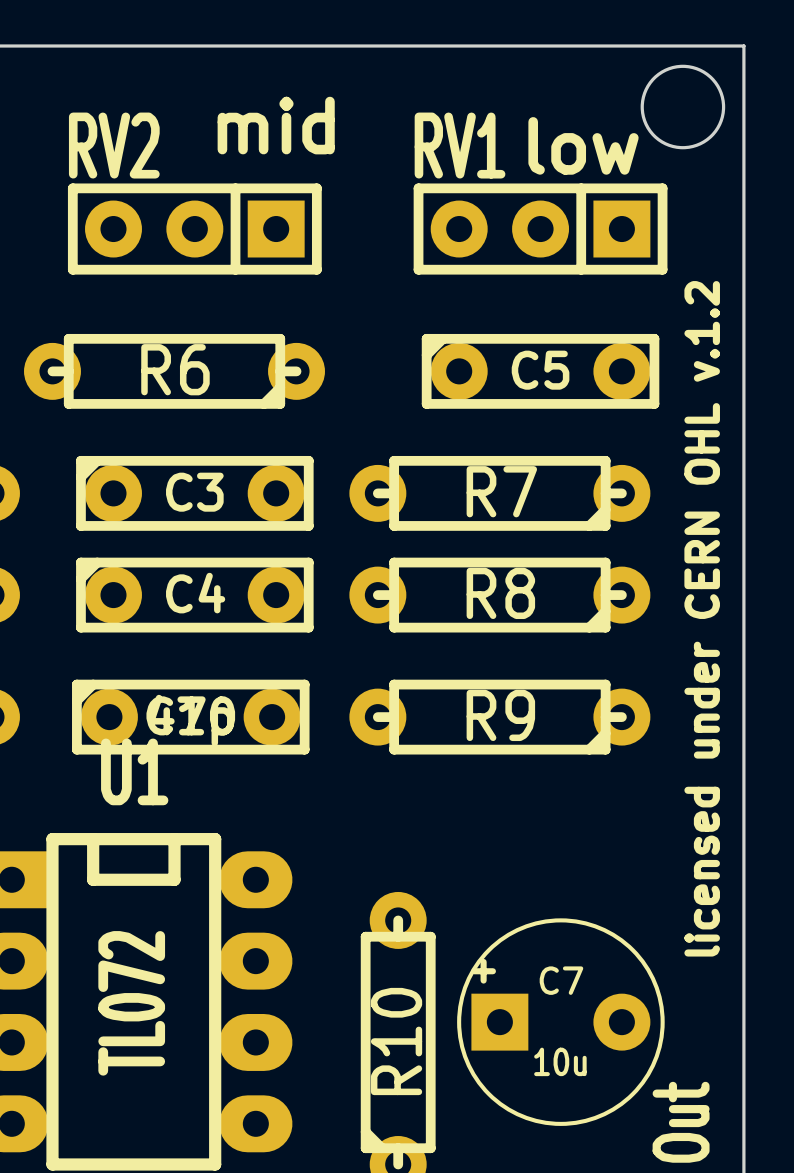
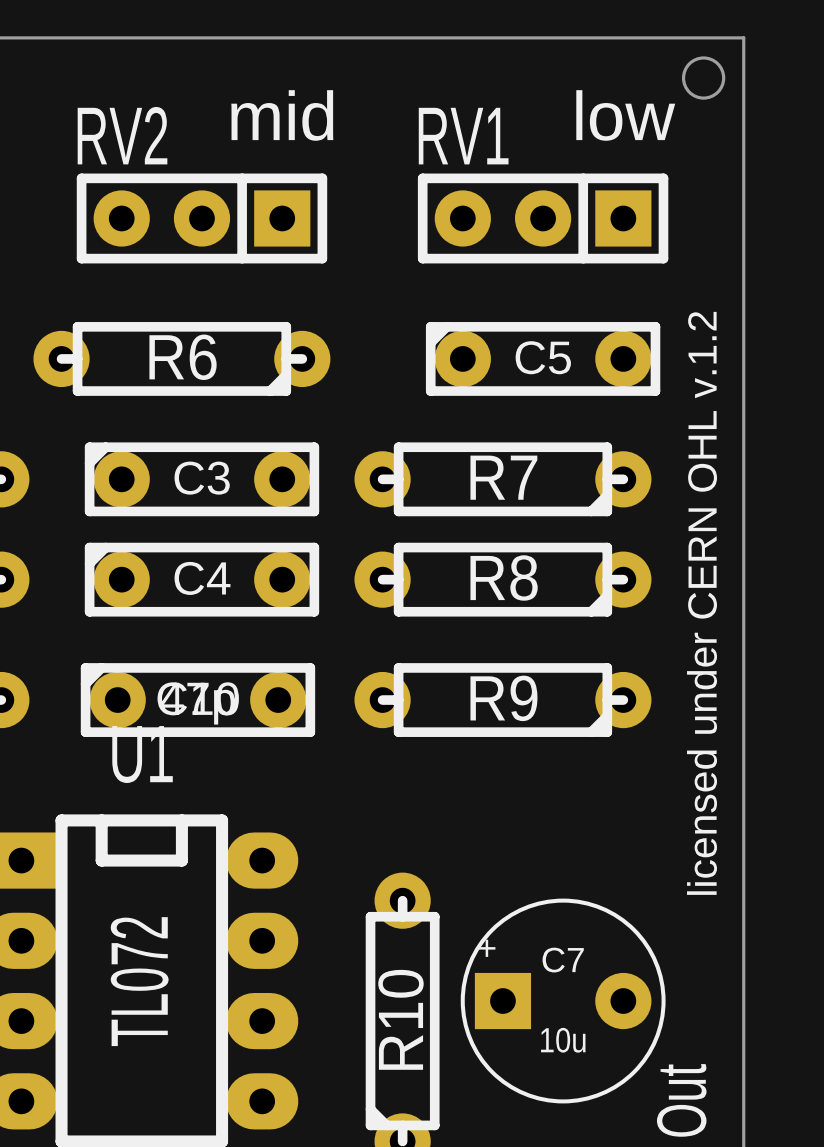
round board edge size: [640, 64, 726, 150] -> [681, 56, 726, 100]
text position: low (583, 145) -> low (625, 115)

